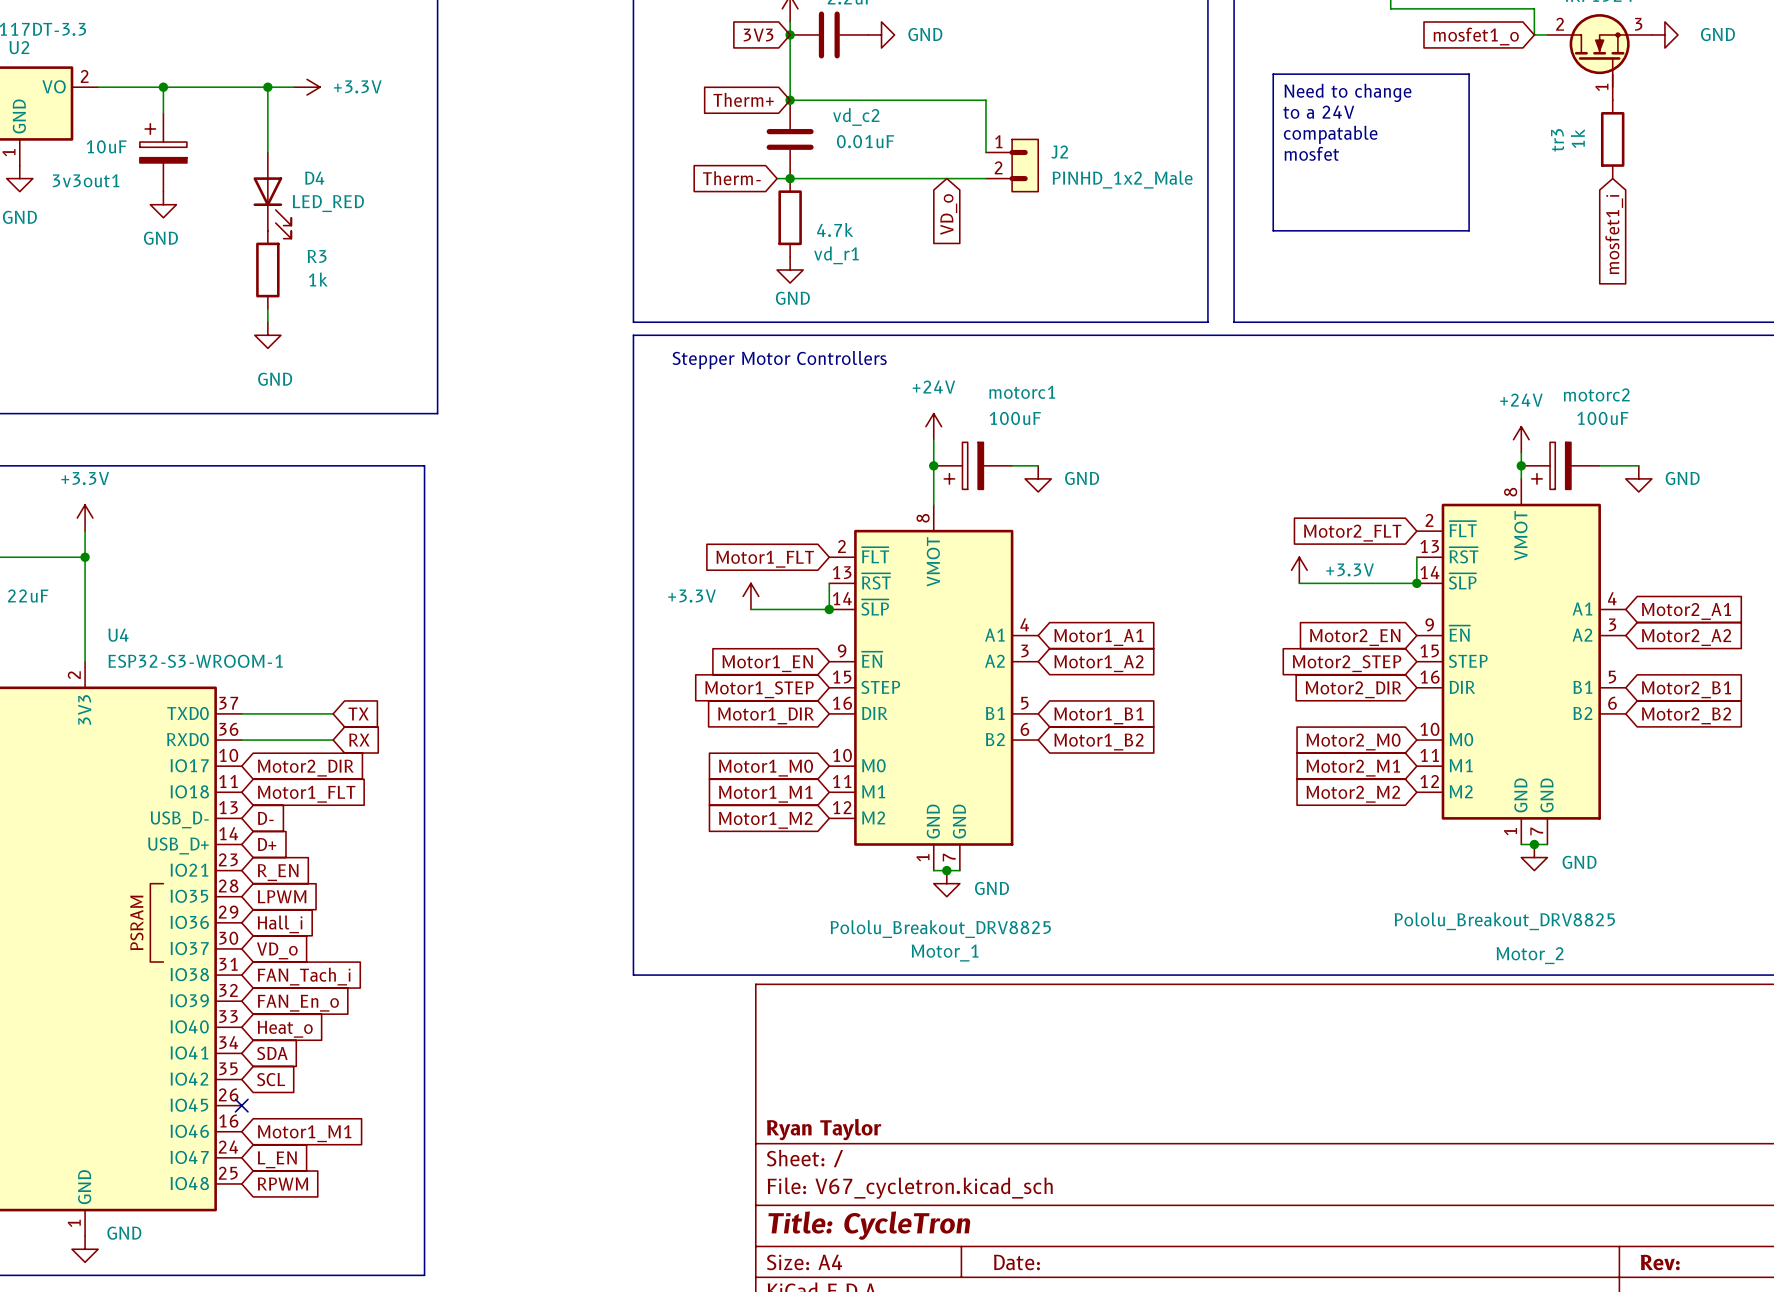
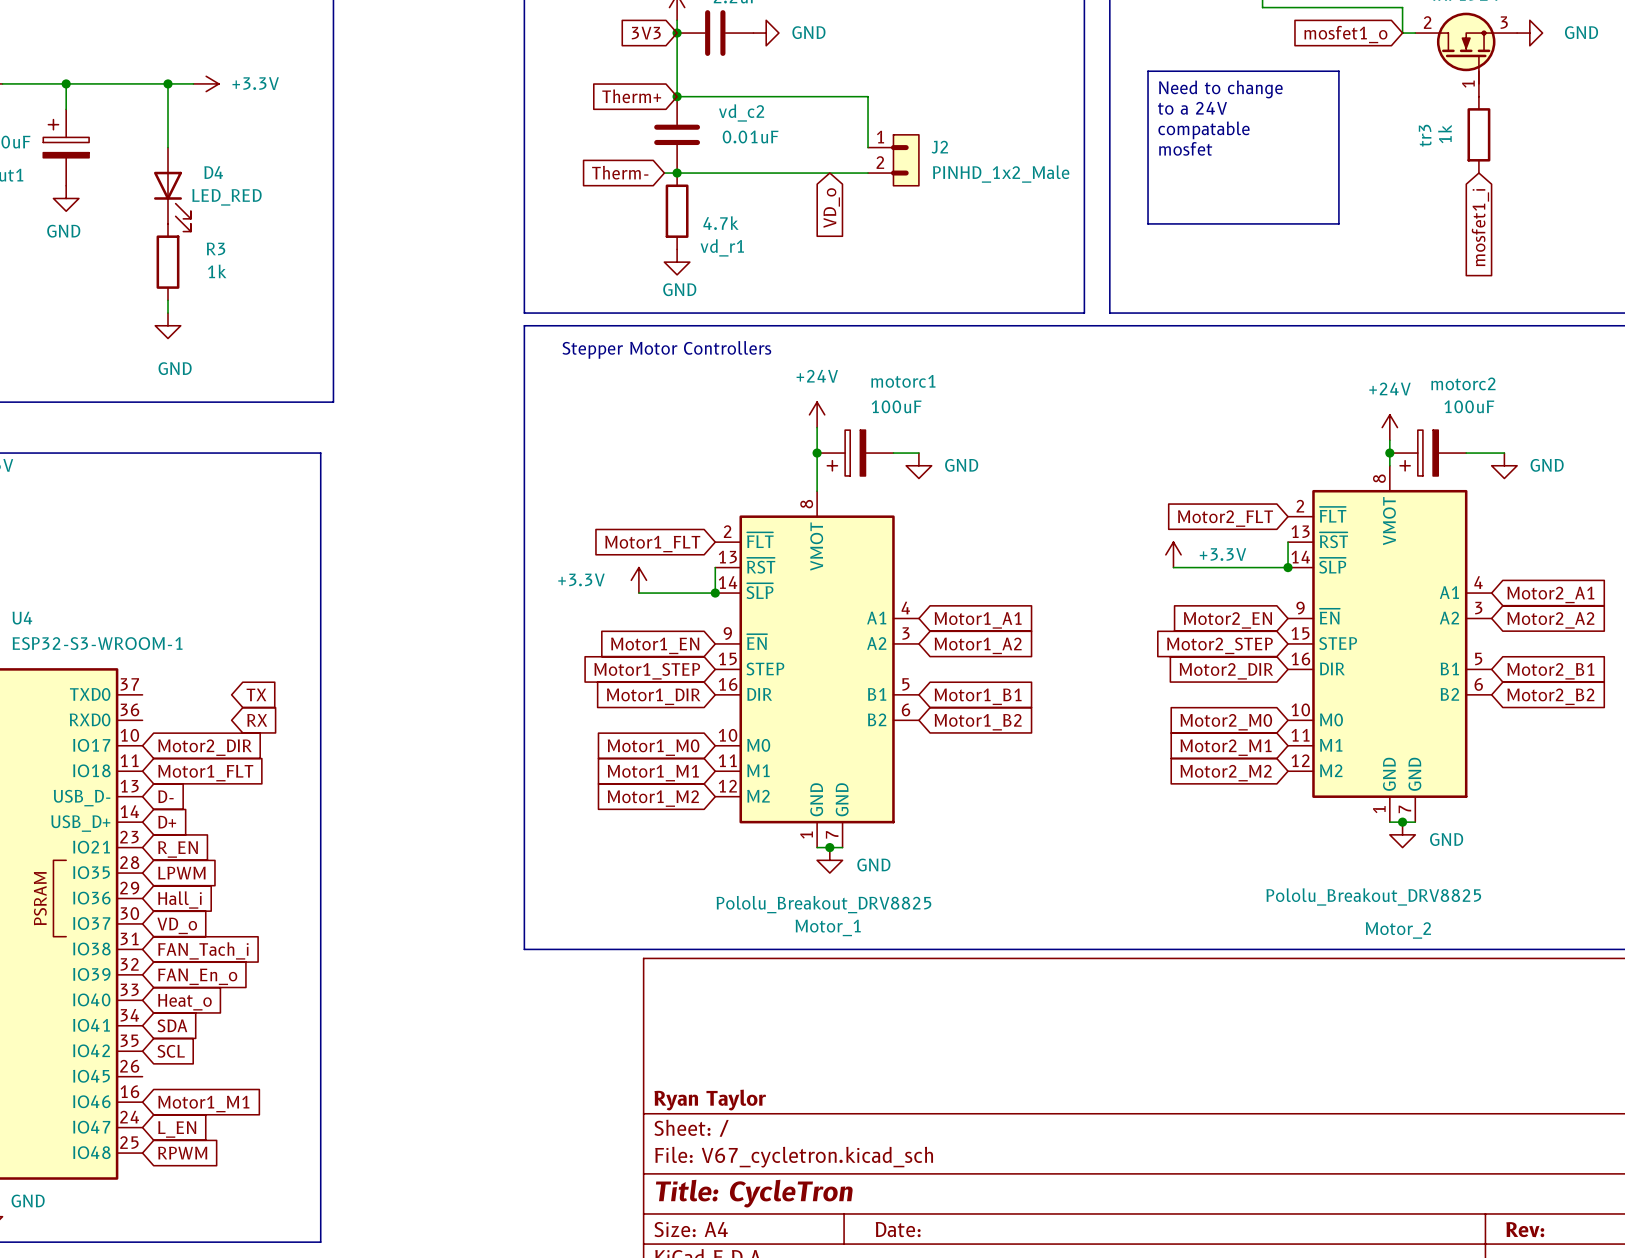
wire: (241, 713) (333, 713) -> none
wire: (241, 740) (333, 740) -> none
no-connect mark: (241, 1105) -> none

